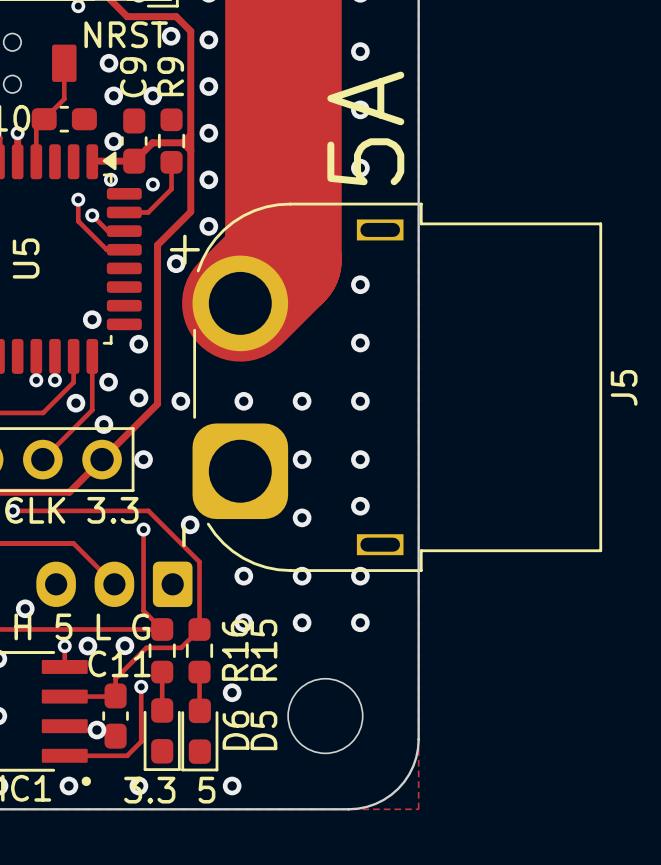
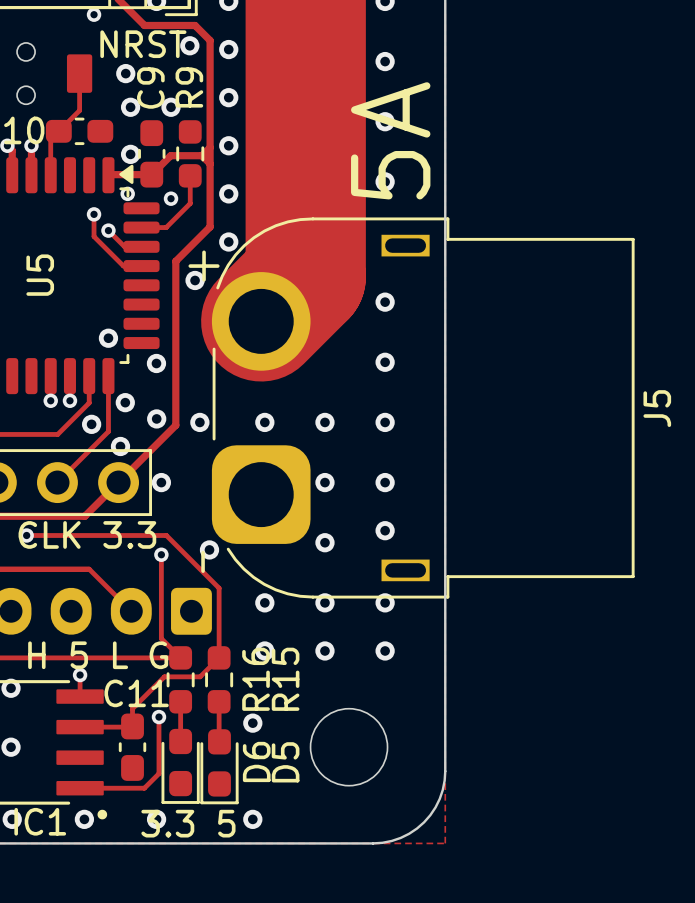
via: (25, 608) -> none
via: (124, 645) -> none
via: (87, 646) -> none
via: (96, 730) -> none

